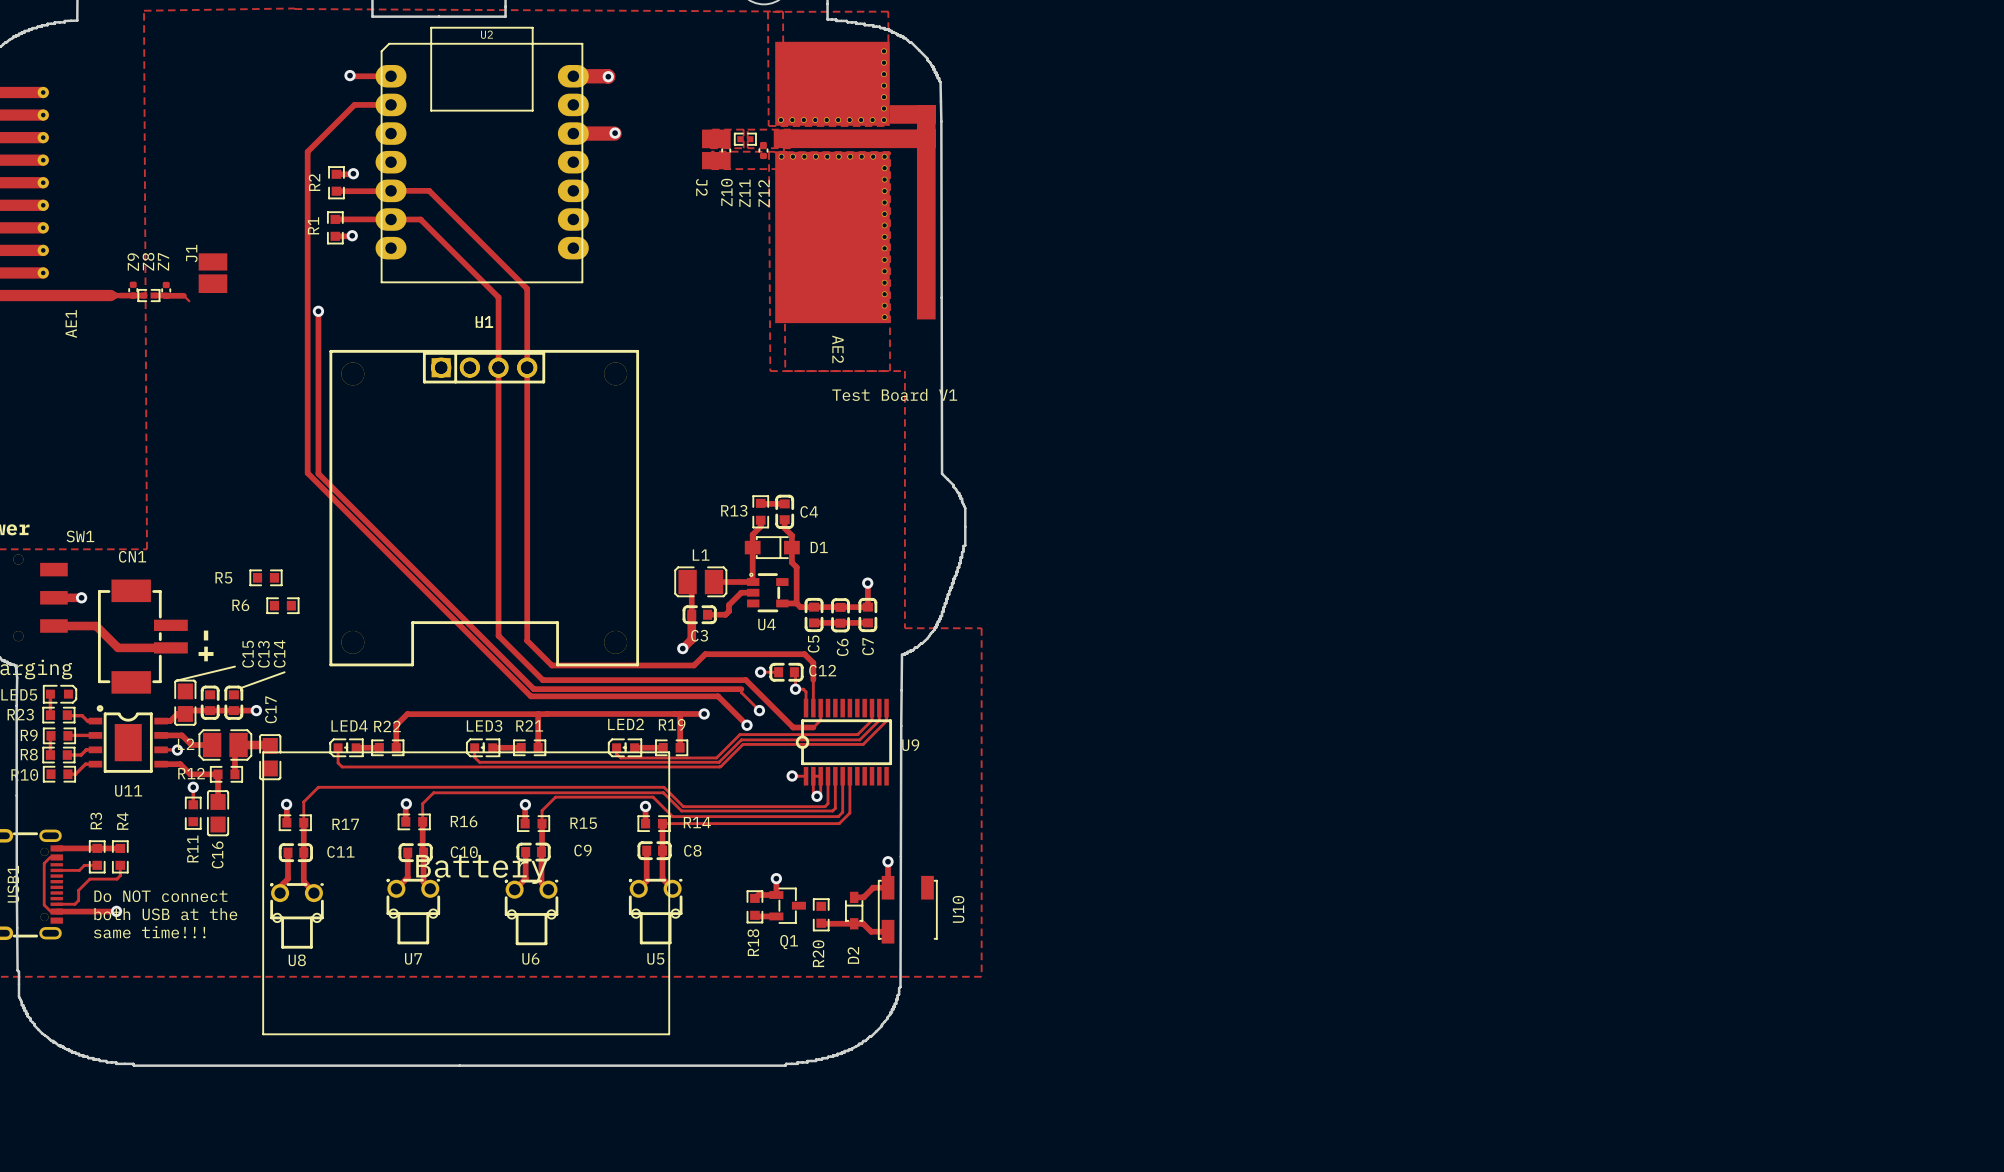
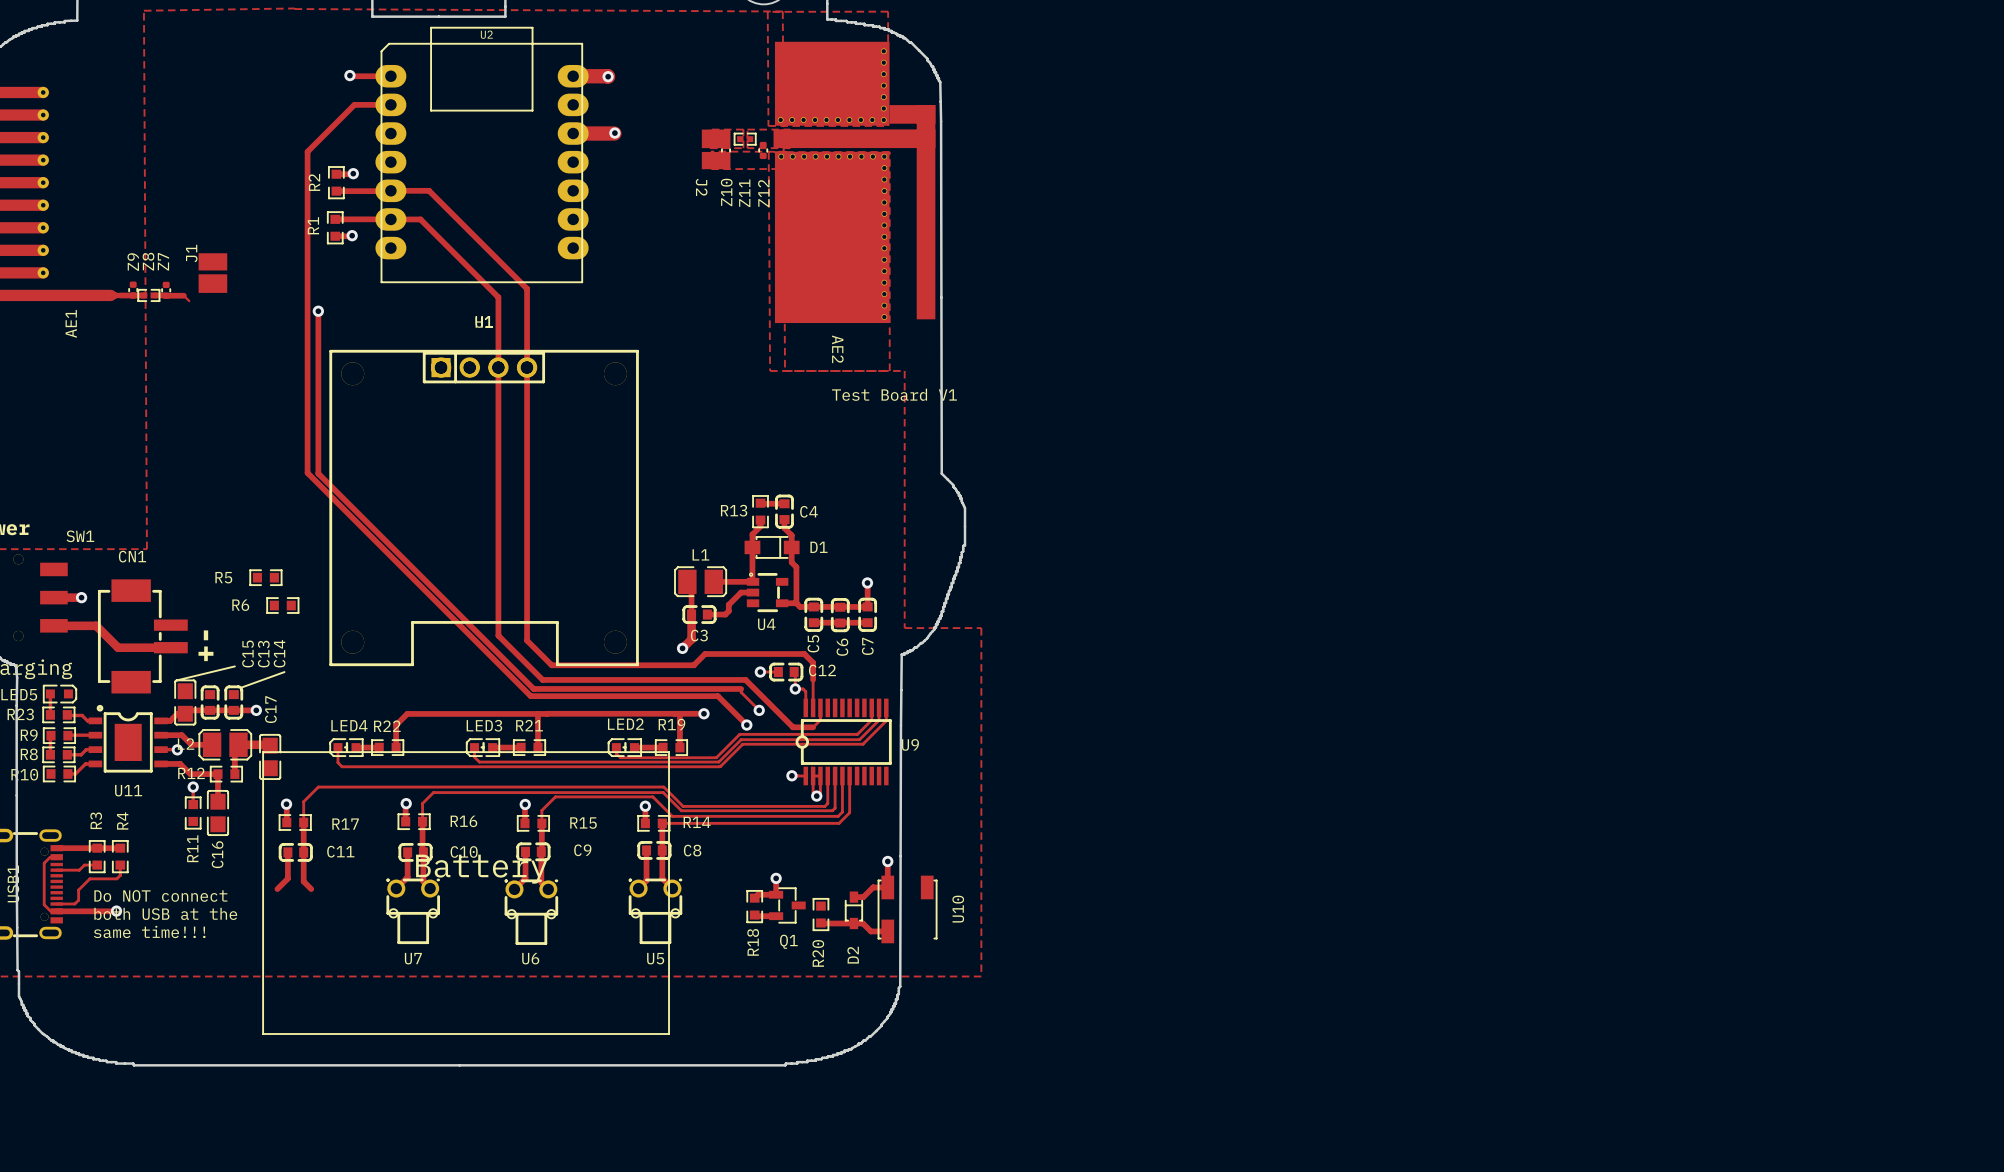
U8: (297, 915) -> none

